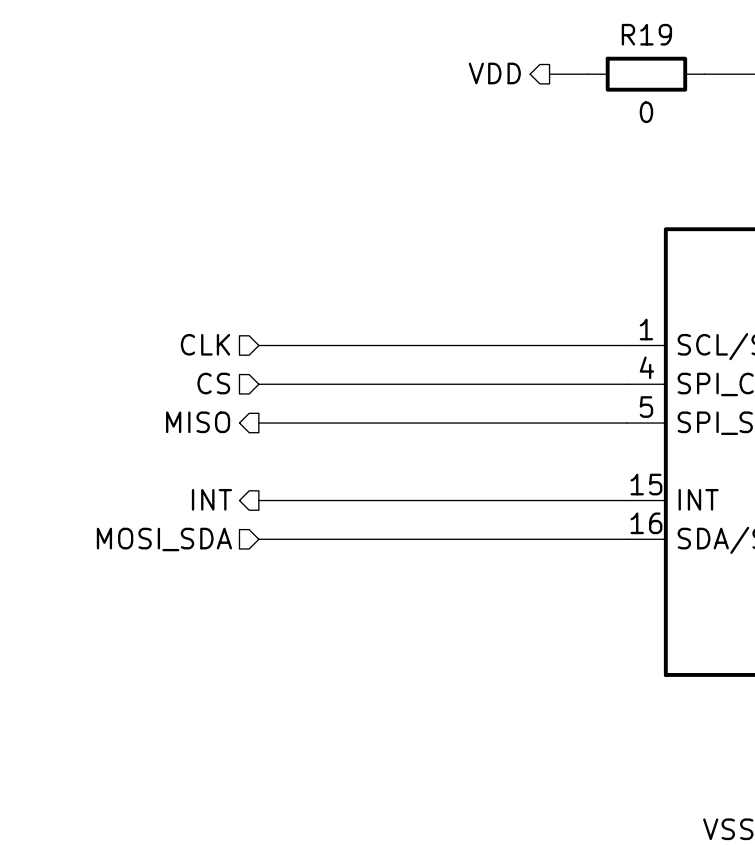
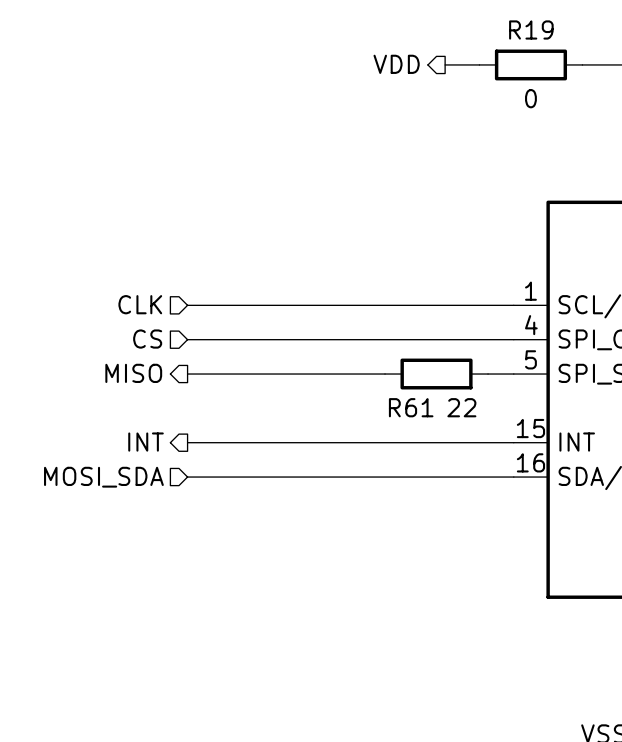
wire: (481, 423) (598, 423) -> none
R61: none -> 22 (436, 374)

